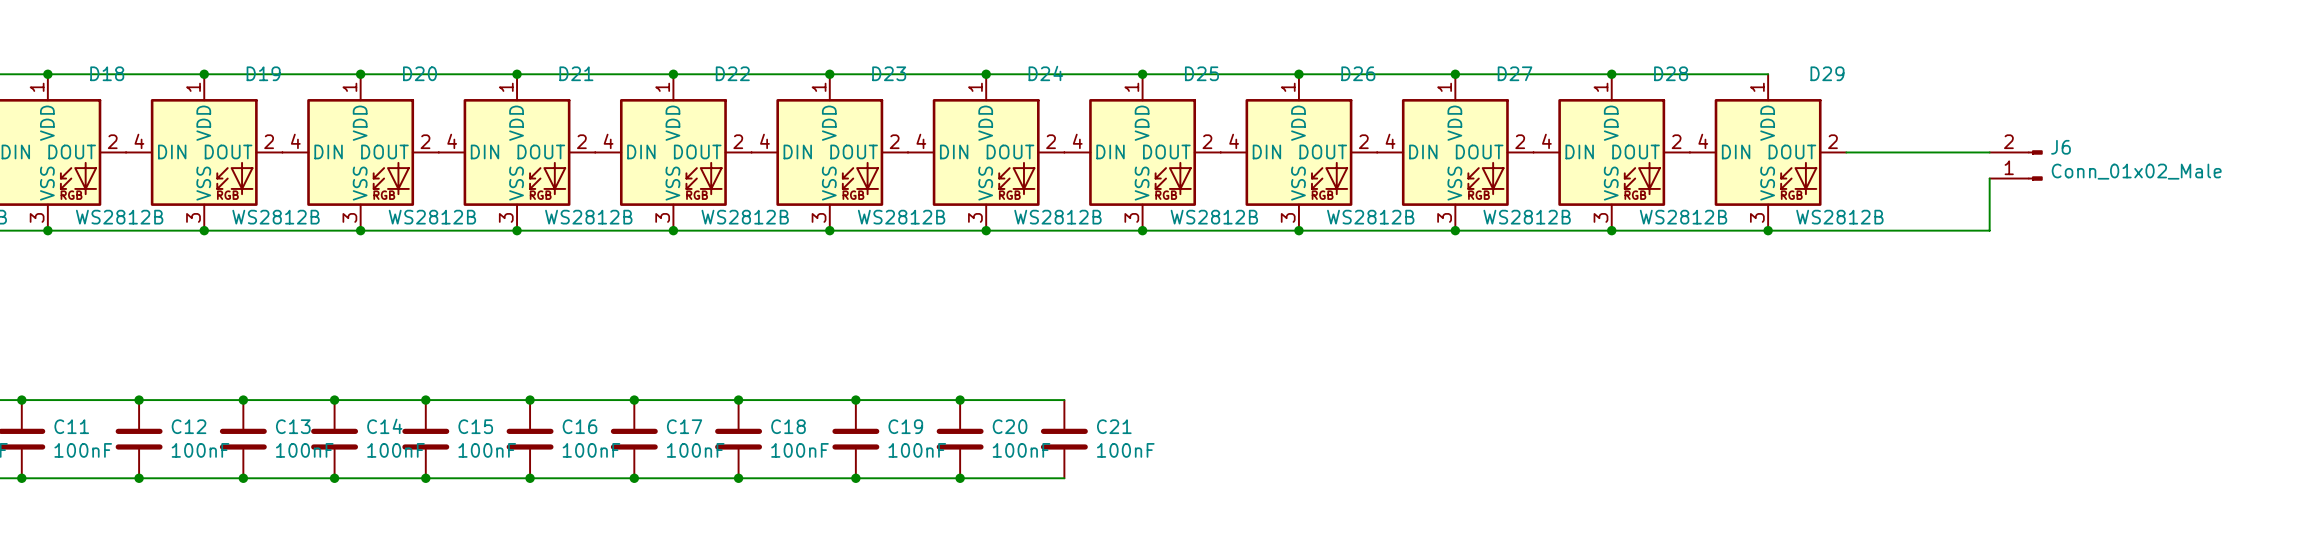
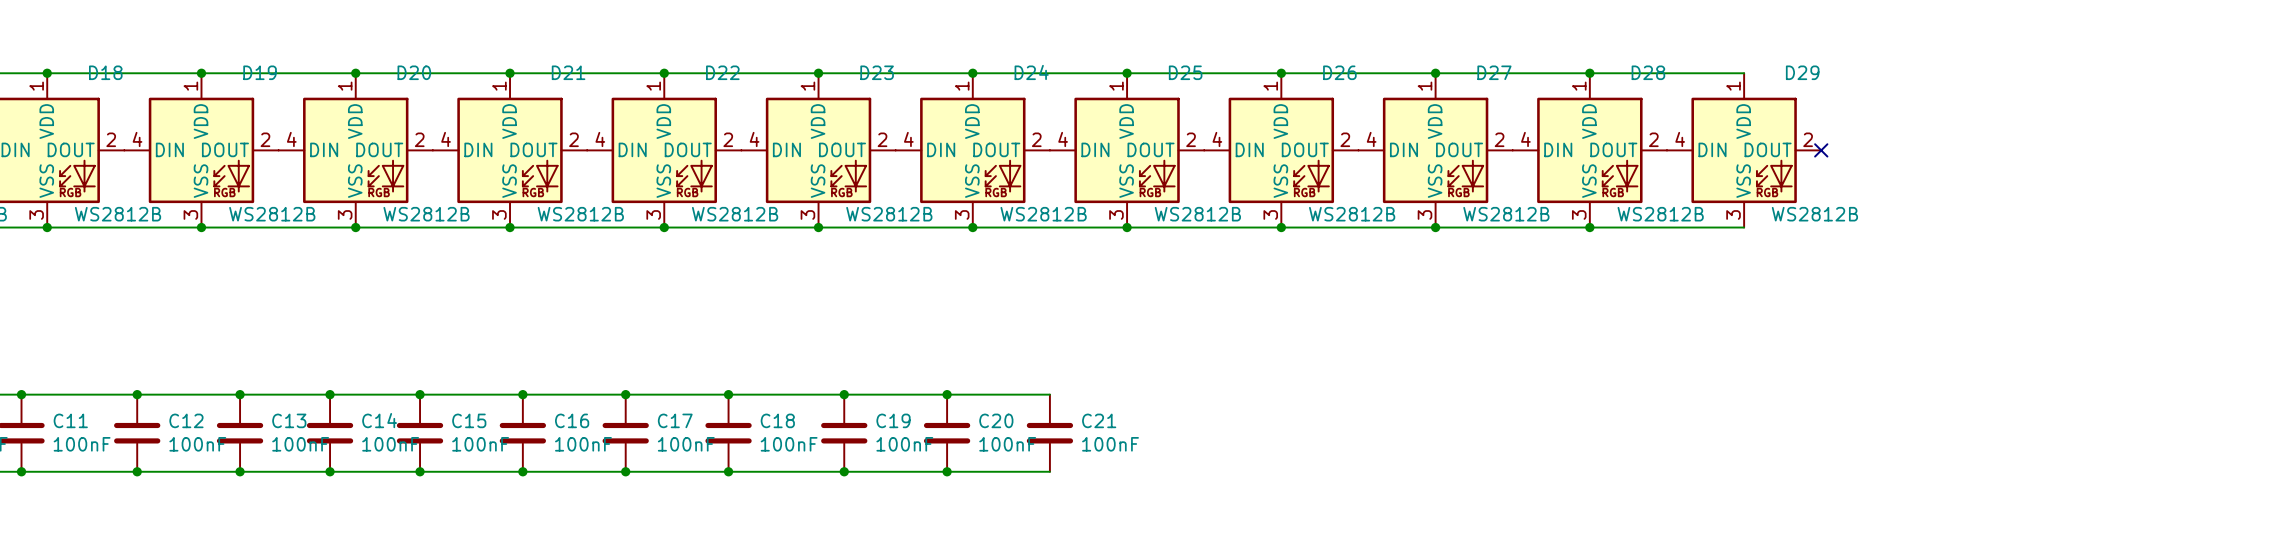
wire: (1846, 152) (1989, 152) -> none
no-connect mark: none -> (1821, 150)
J6: Conn_01x02_Male (2016, 165) -> none
wire: (1989, 178) (1989, 230) (1768, 230) -> none
junction: (1768, 230) -> none

